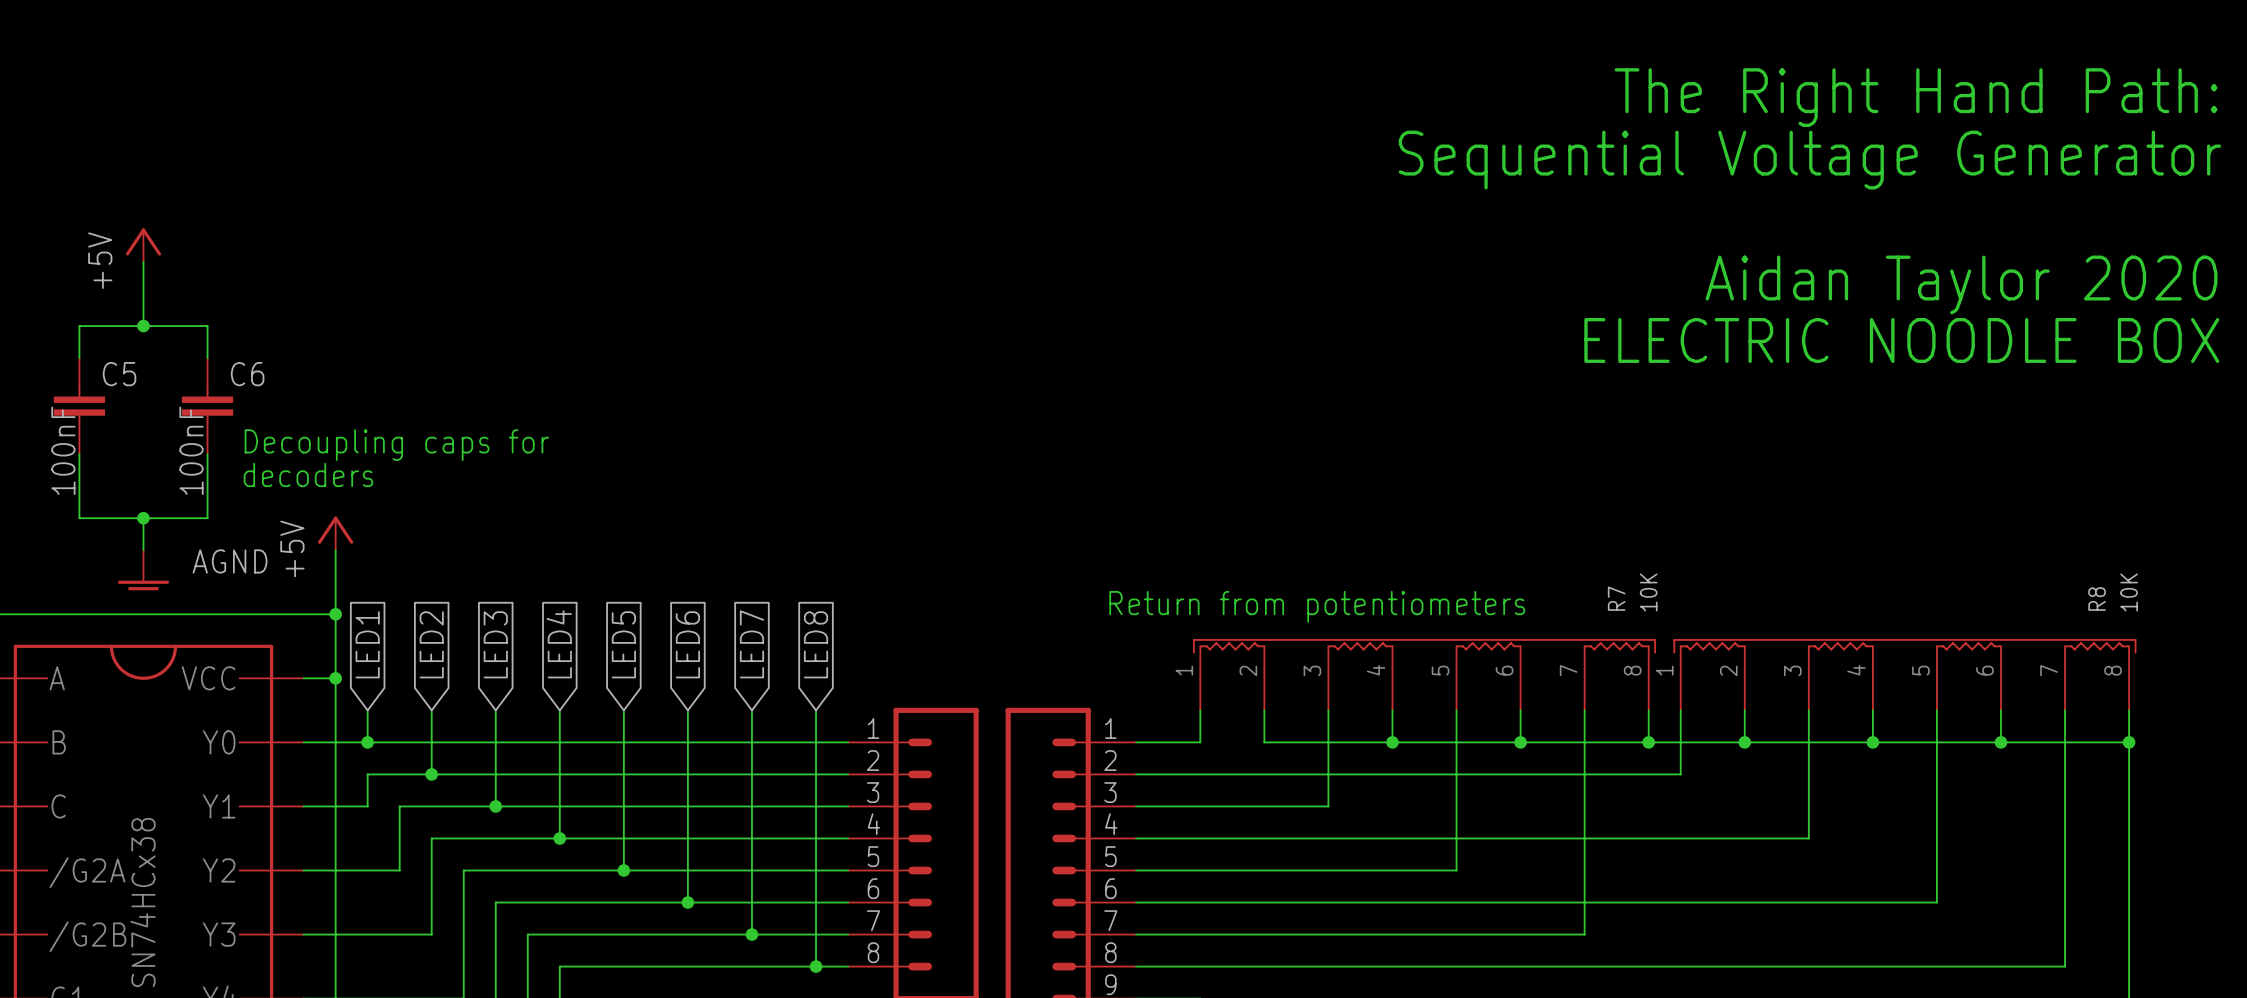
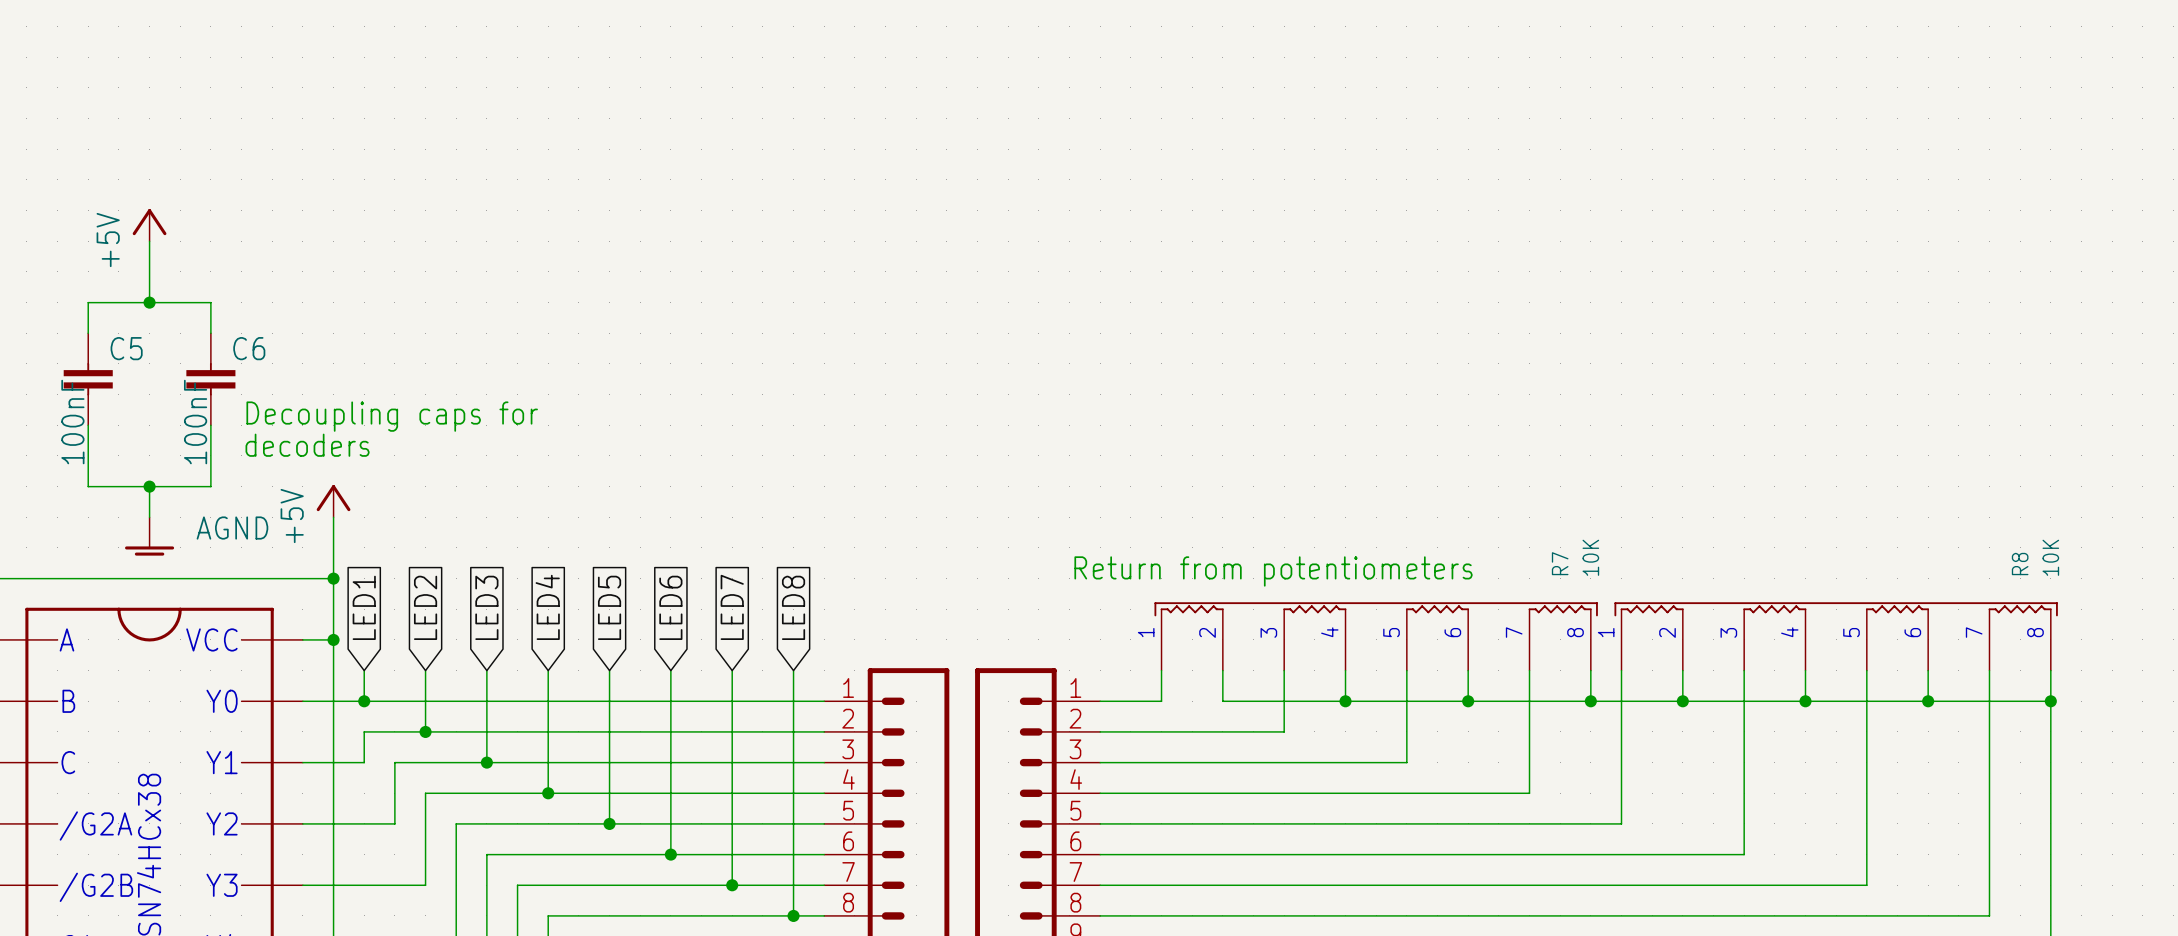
text: The Right Hand Path: (1916, 97) -> none
text: Sequential Voltage Generator (1809, 160) -> none
text: Aidan Taylor 2020 (1961, 284) -> none
text: ELECTRIC NOODLE BOX (1901, 340) -> none
wire: (1680, 774) (1328, 774) (1328, 806) -> (1621, 731) (1621, 823) (1406, 823)
wire: (1456, 806) (1456, 870) -> (1406, 762) (1284, 762)
wire: (1808, 838) (1584, 838) (1584, 934) -> (1866, 854) (1866, 885) (1529, 885)
wire: (1808, 902) (1936, 902) -> (1744, 854) (1744, 793)

